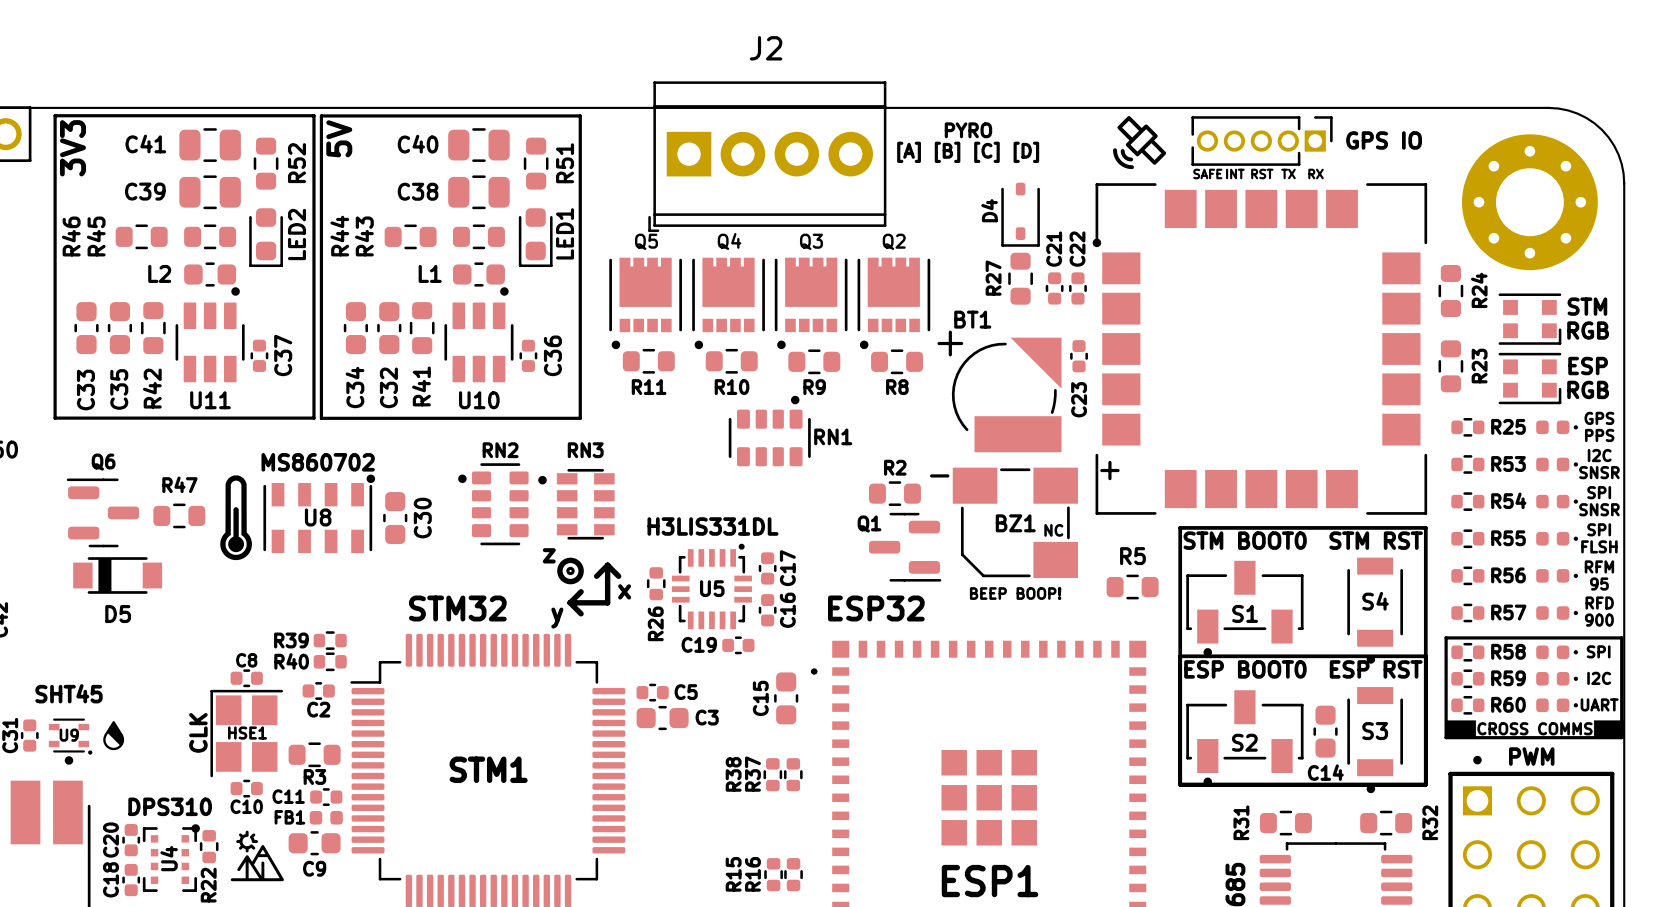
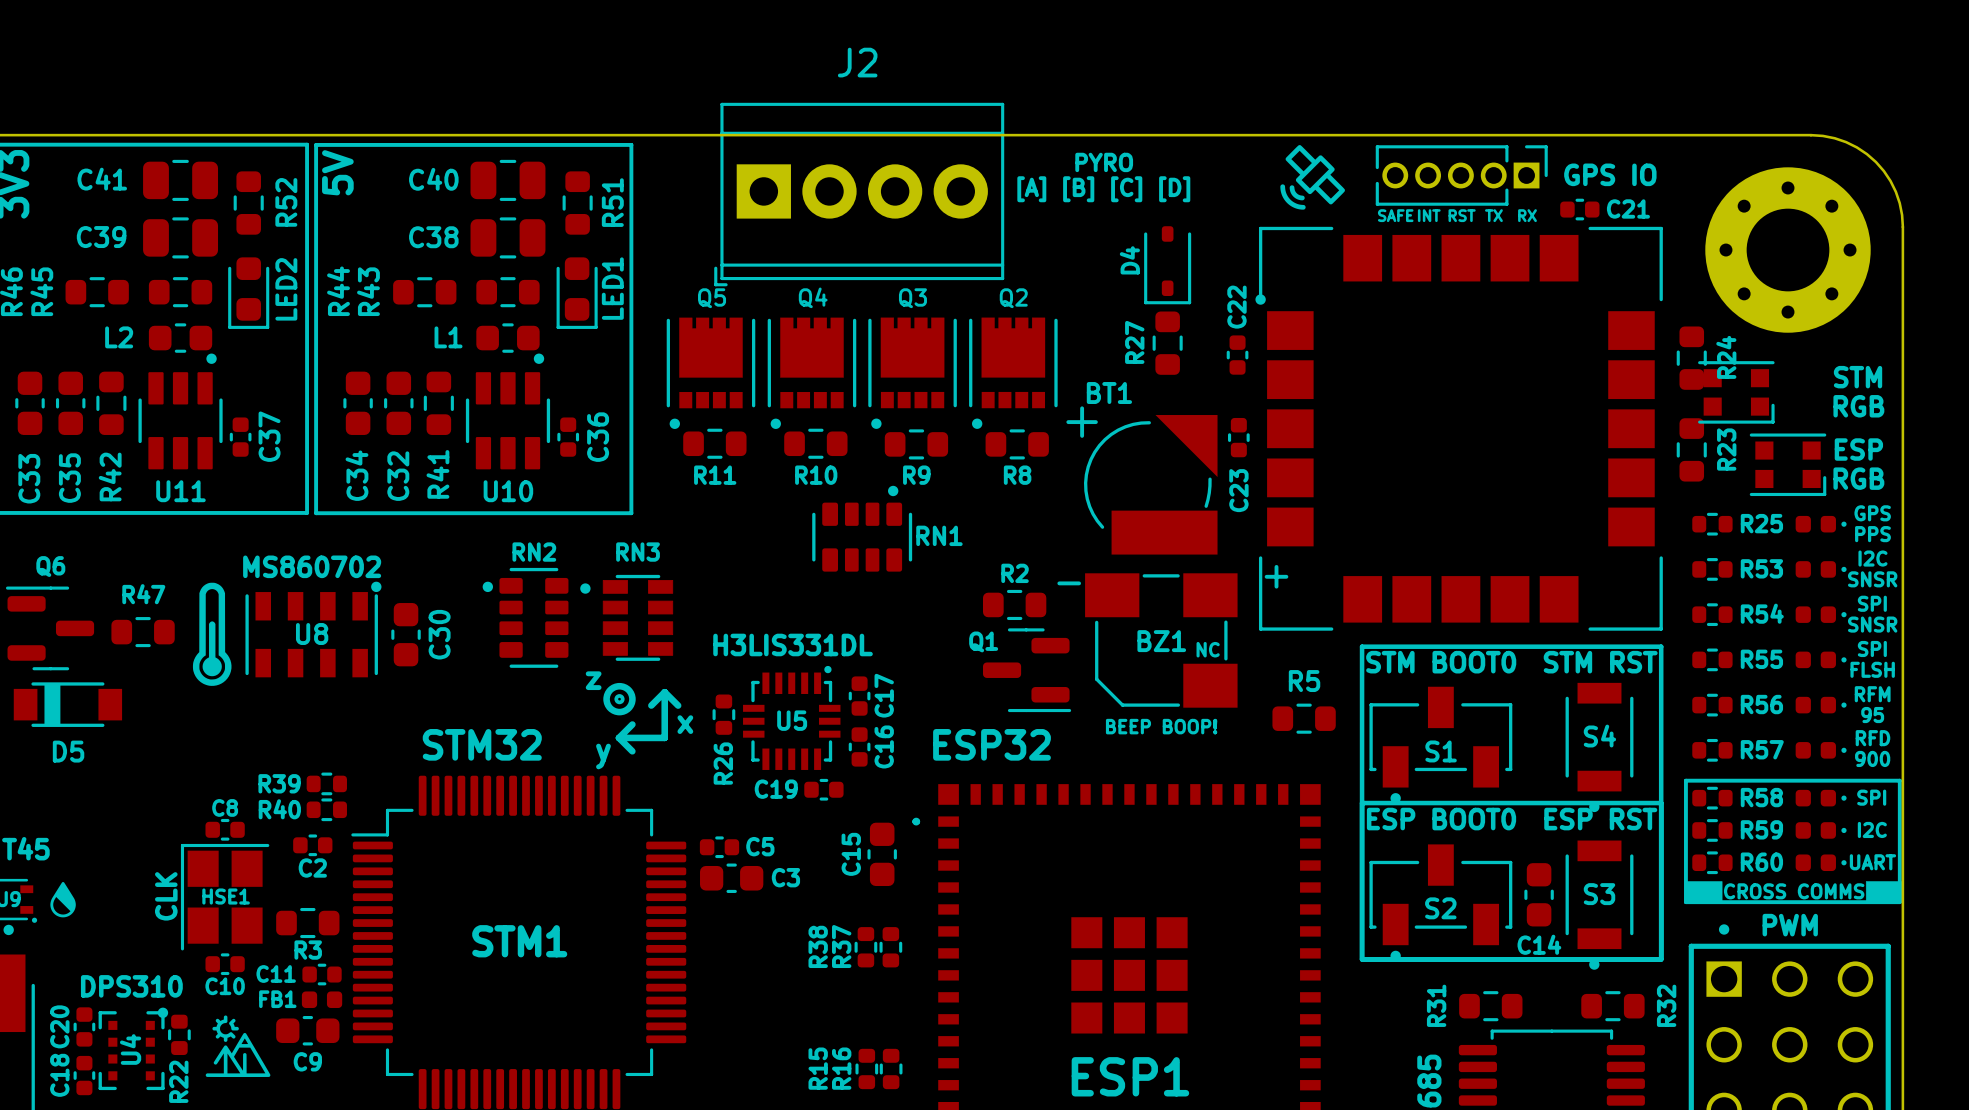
C21 rotation: 0° (1054, 288) -> 90° clockwise (1579, 209)
C21 position: (1054, 288) -> (1579, 209)
part position: (1529, 319) -> (1736, 392)

